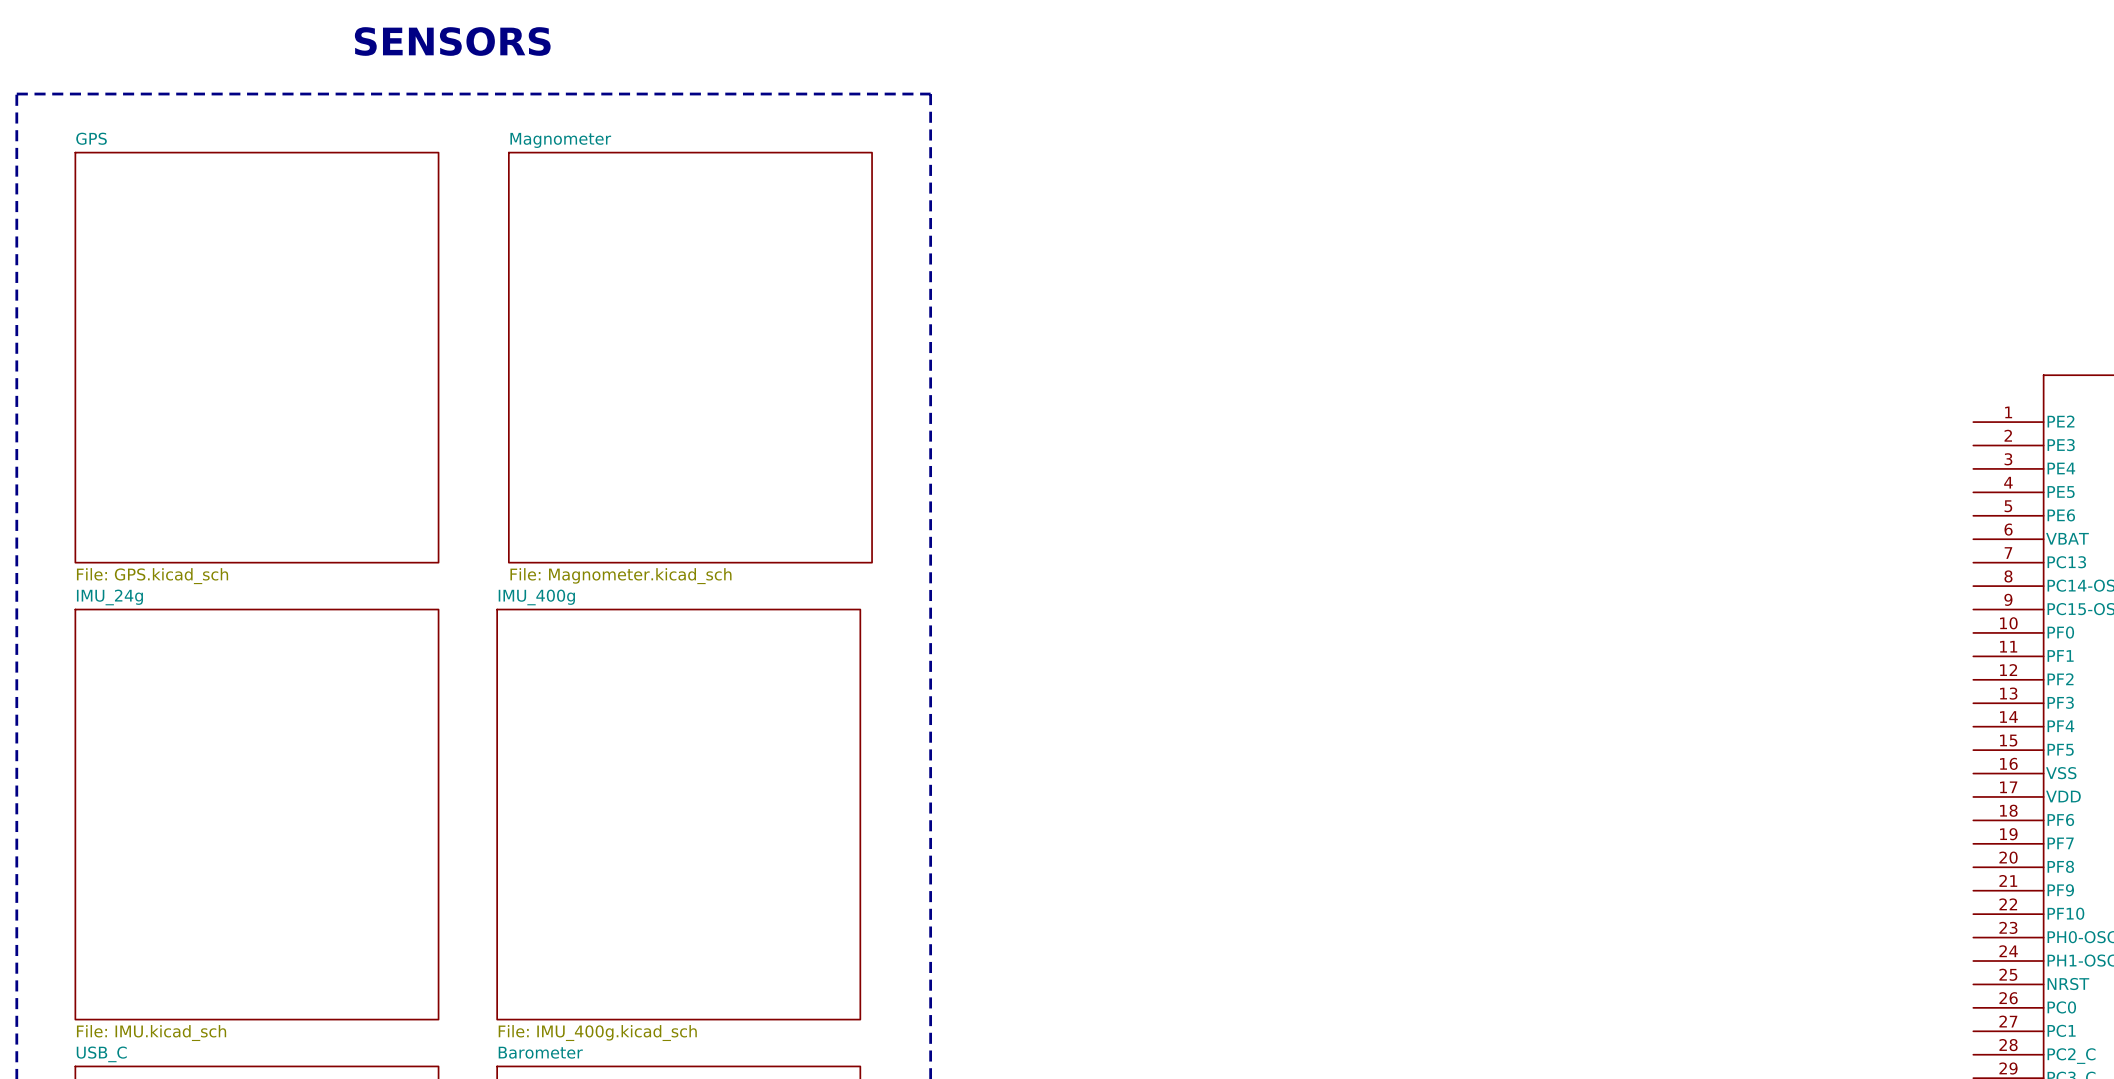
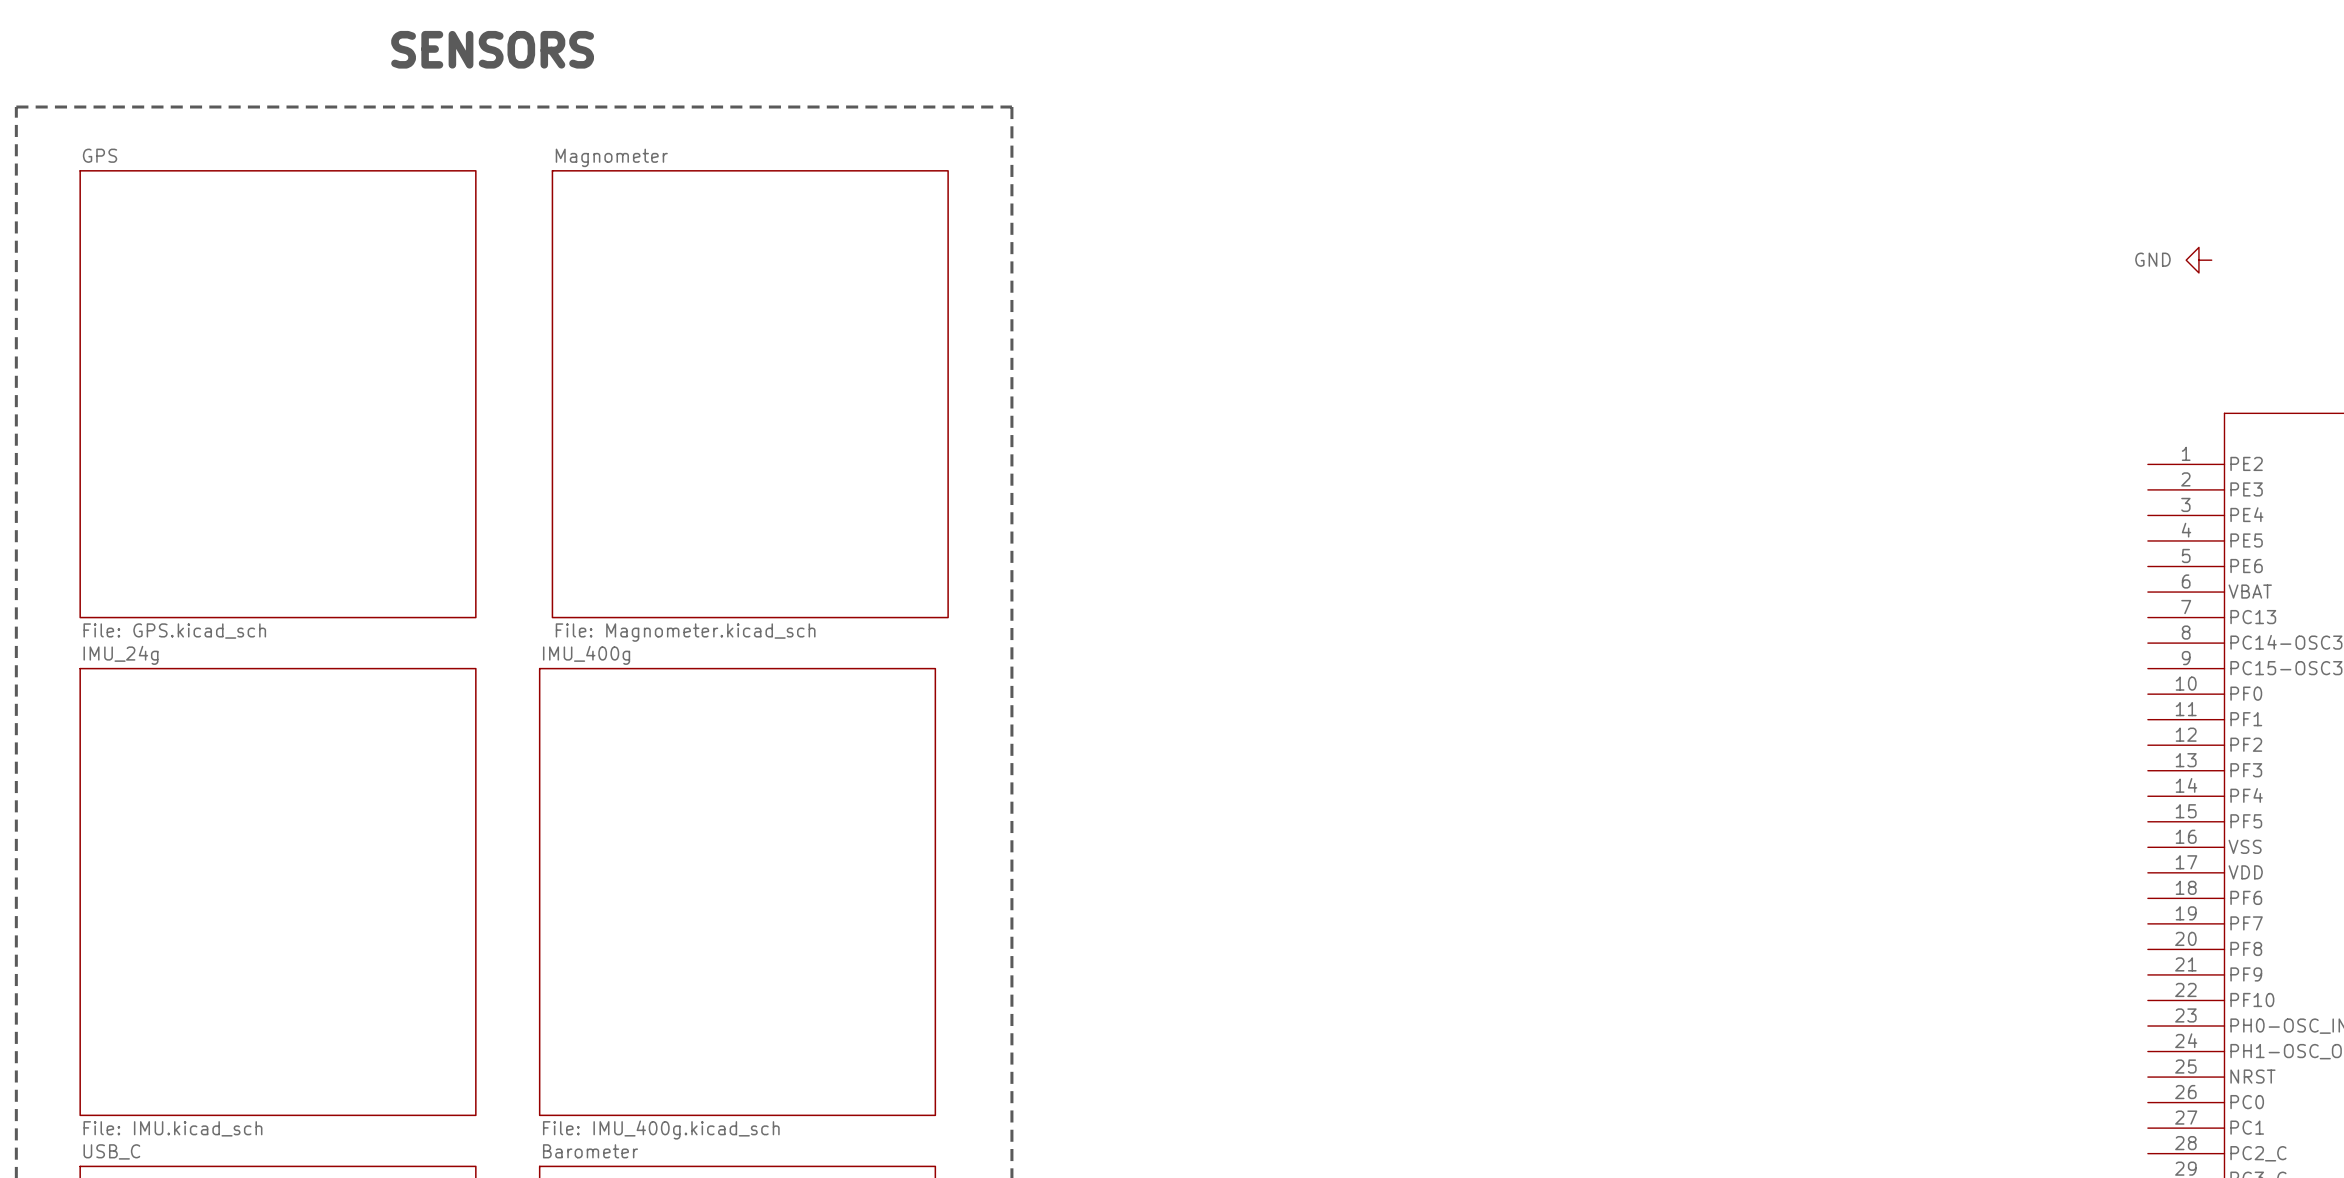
power symbol: none -> GND (2198, 260)

